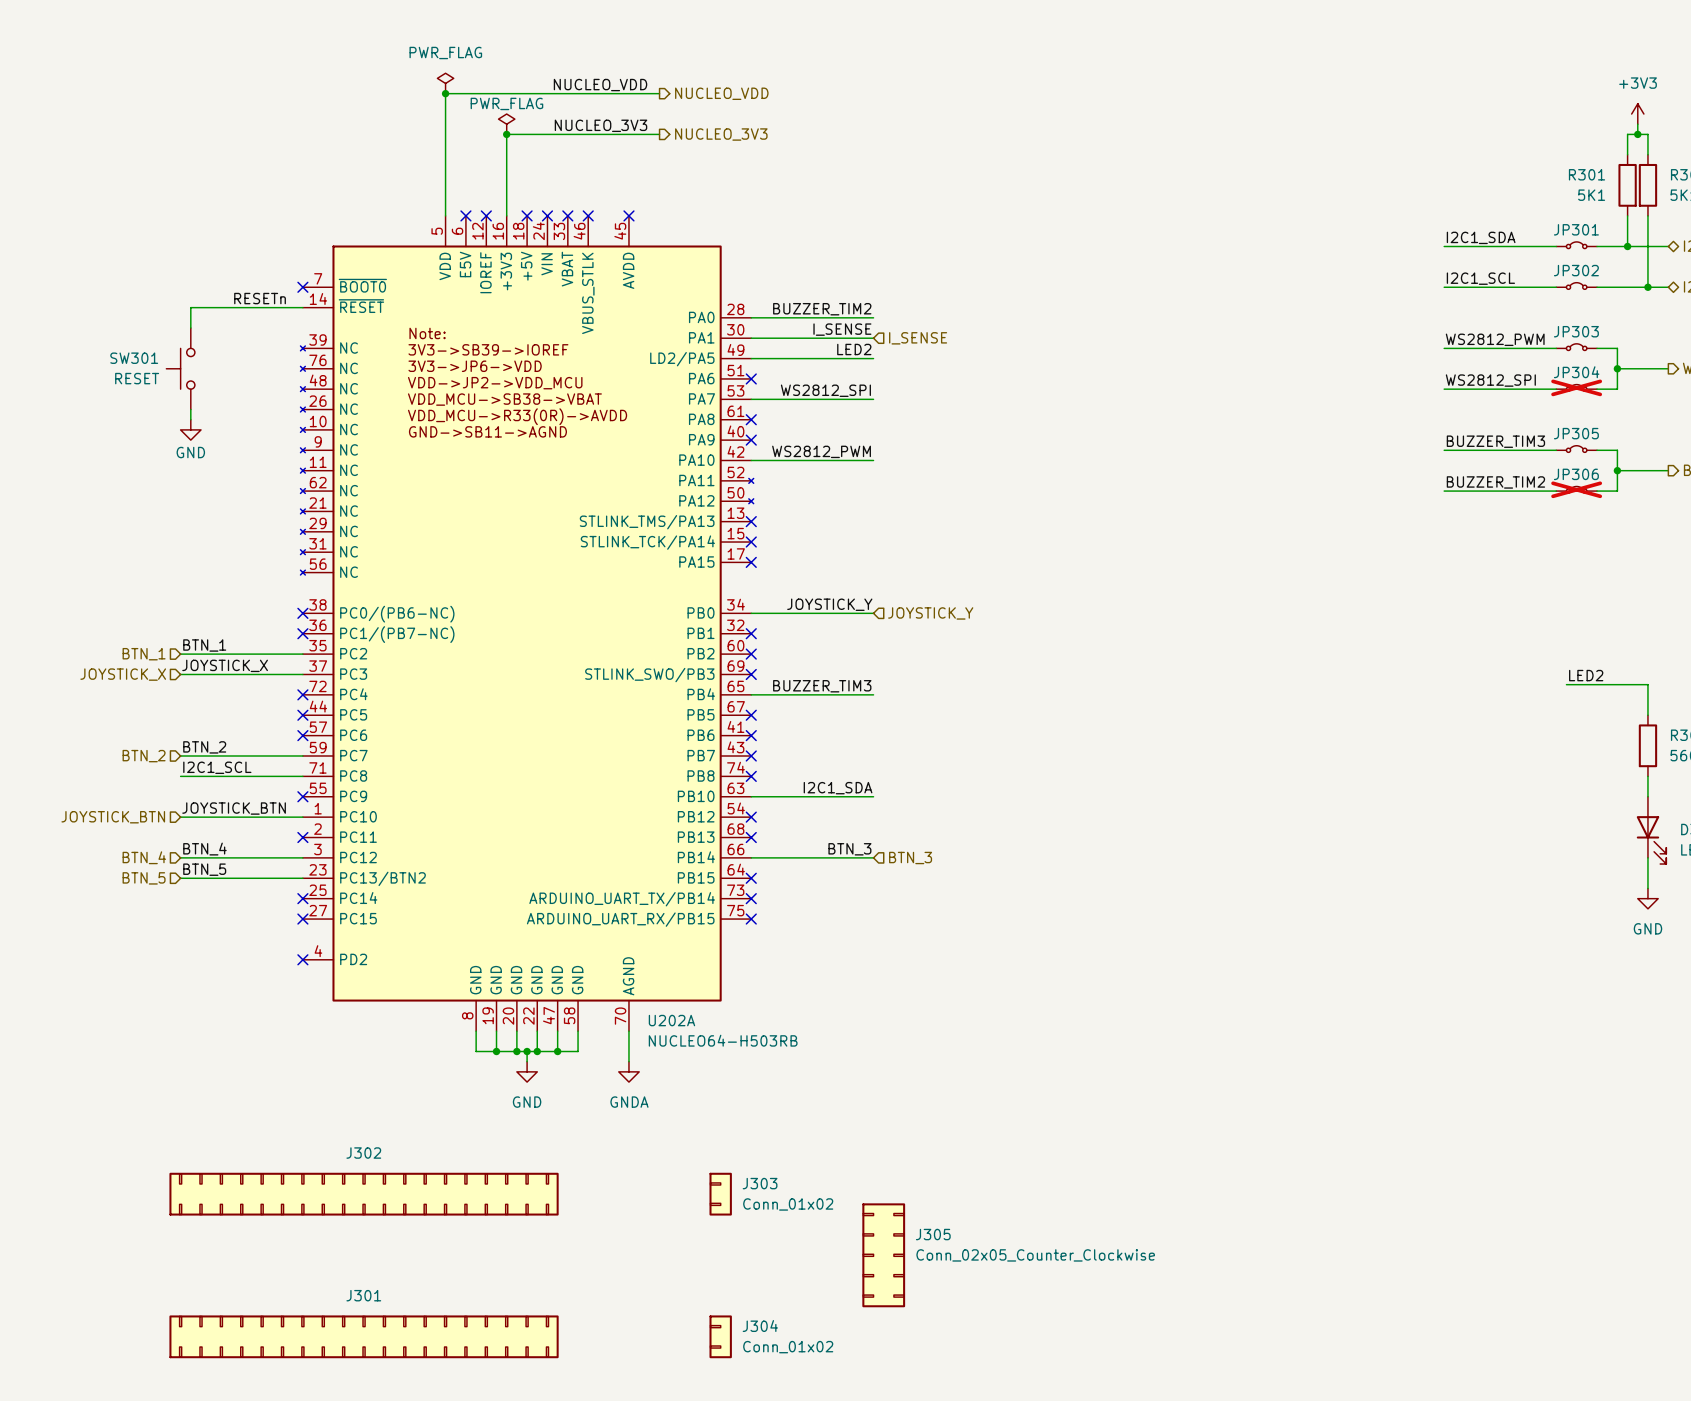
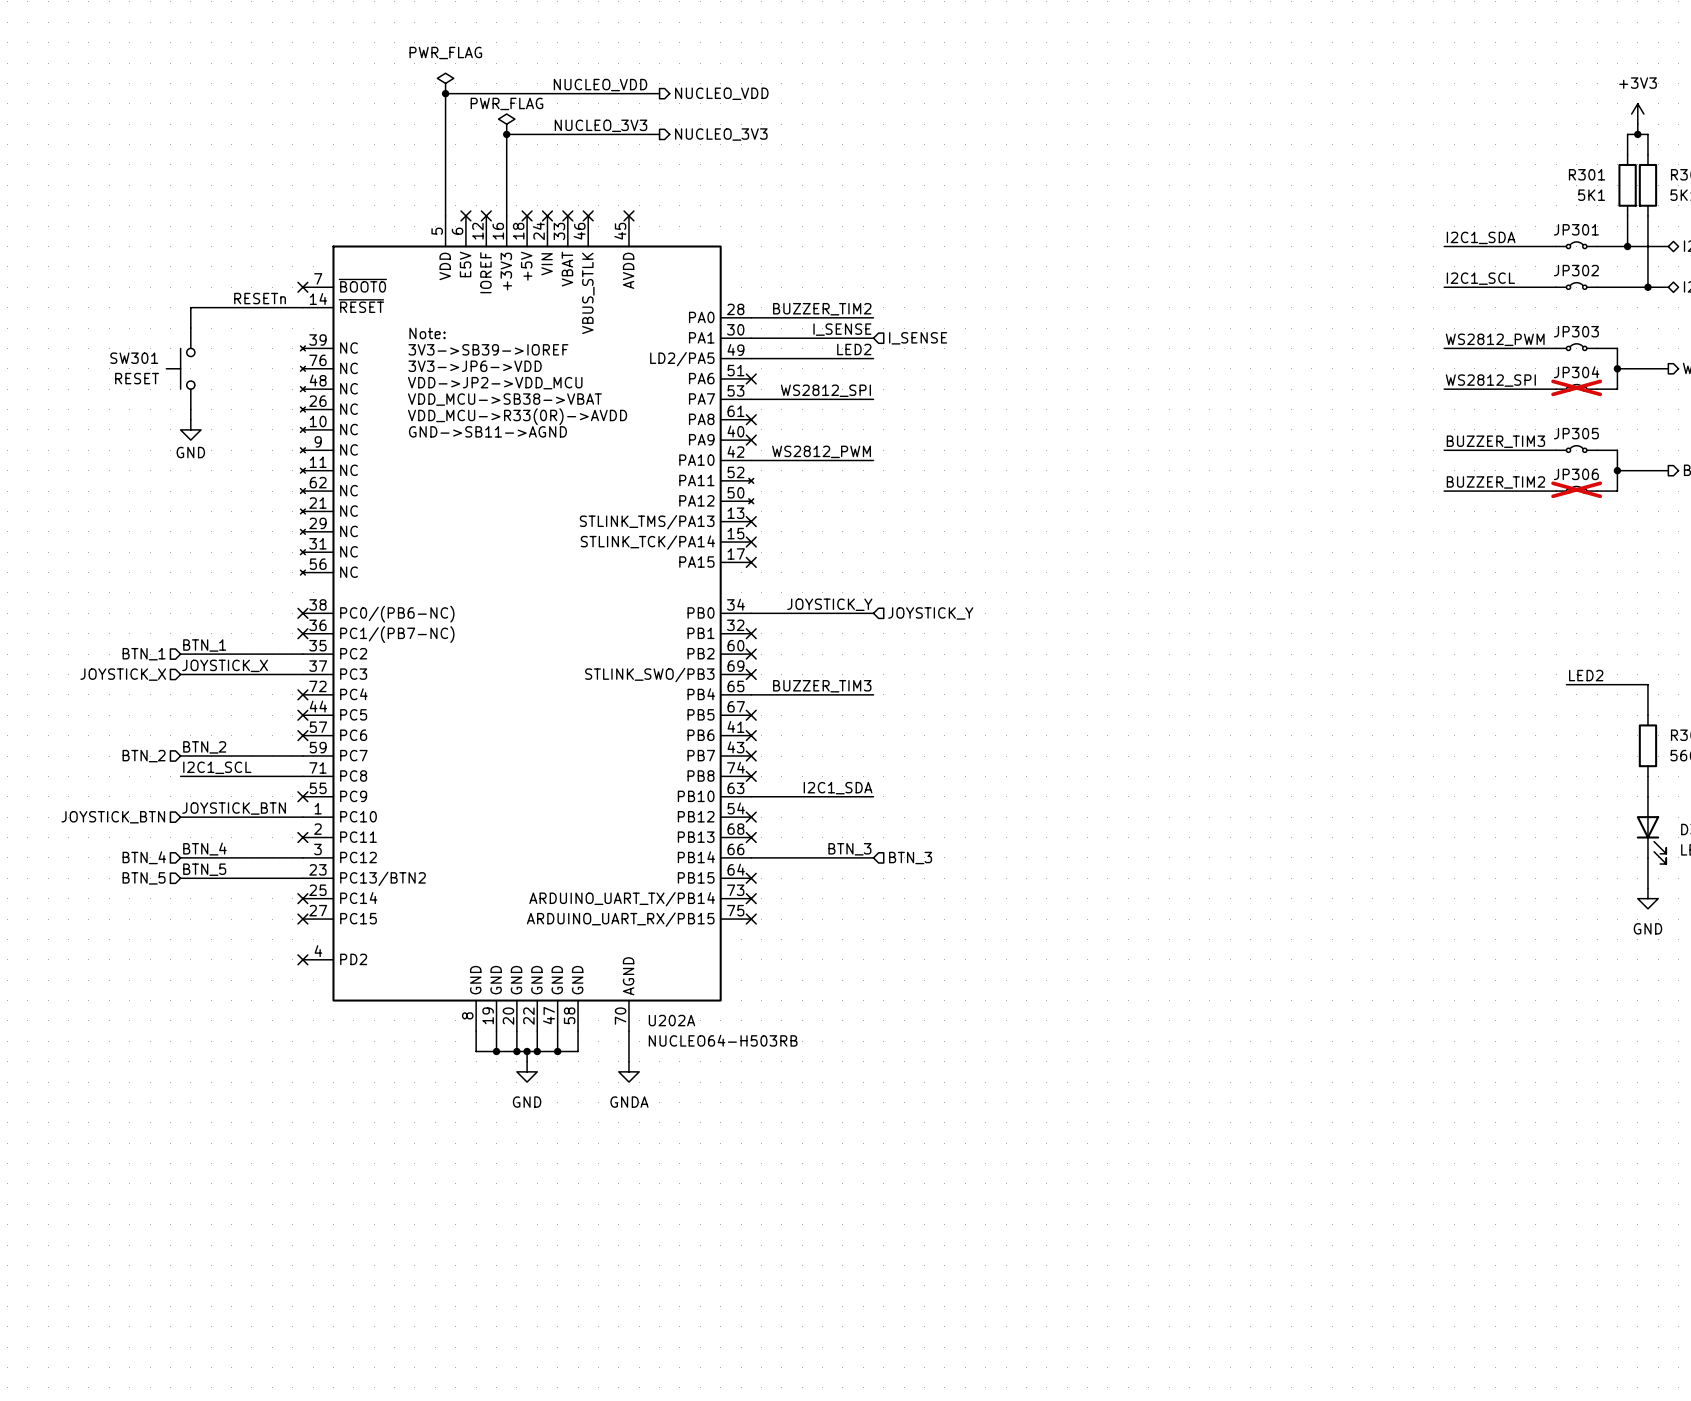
J302: (364, 1194) -> none
J303: Conn_01x02 (720, 1194) -> none
J305: Conn_02x05_Counter_Clockwise (883, 1255) -> none
J301: (364, 1336) -> none
J304: Conn_01x02 (720, 1336) -> none

